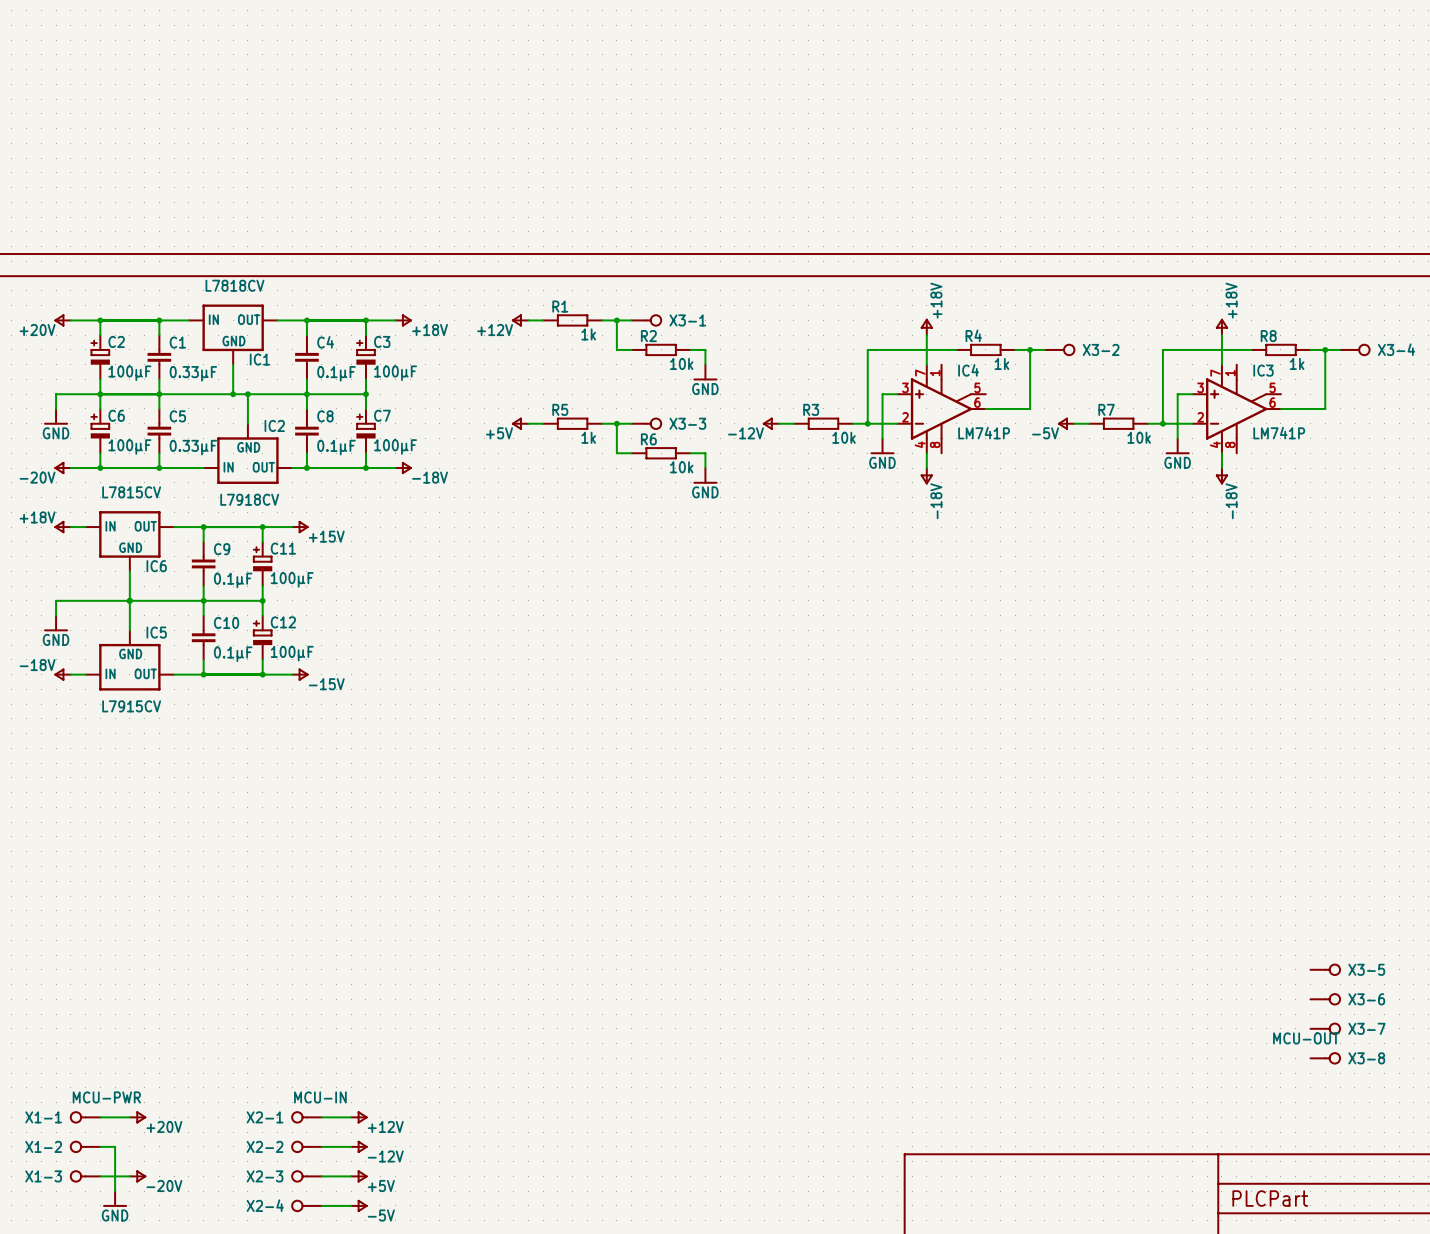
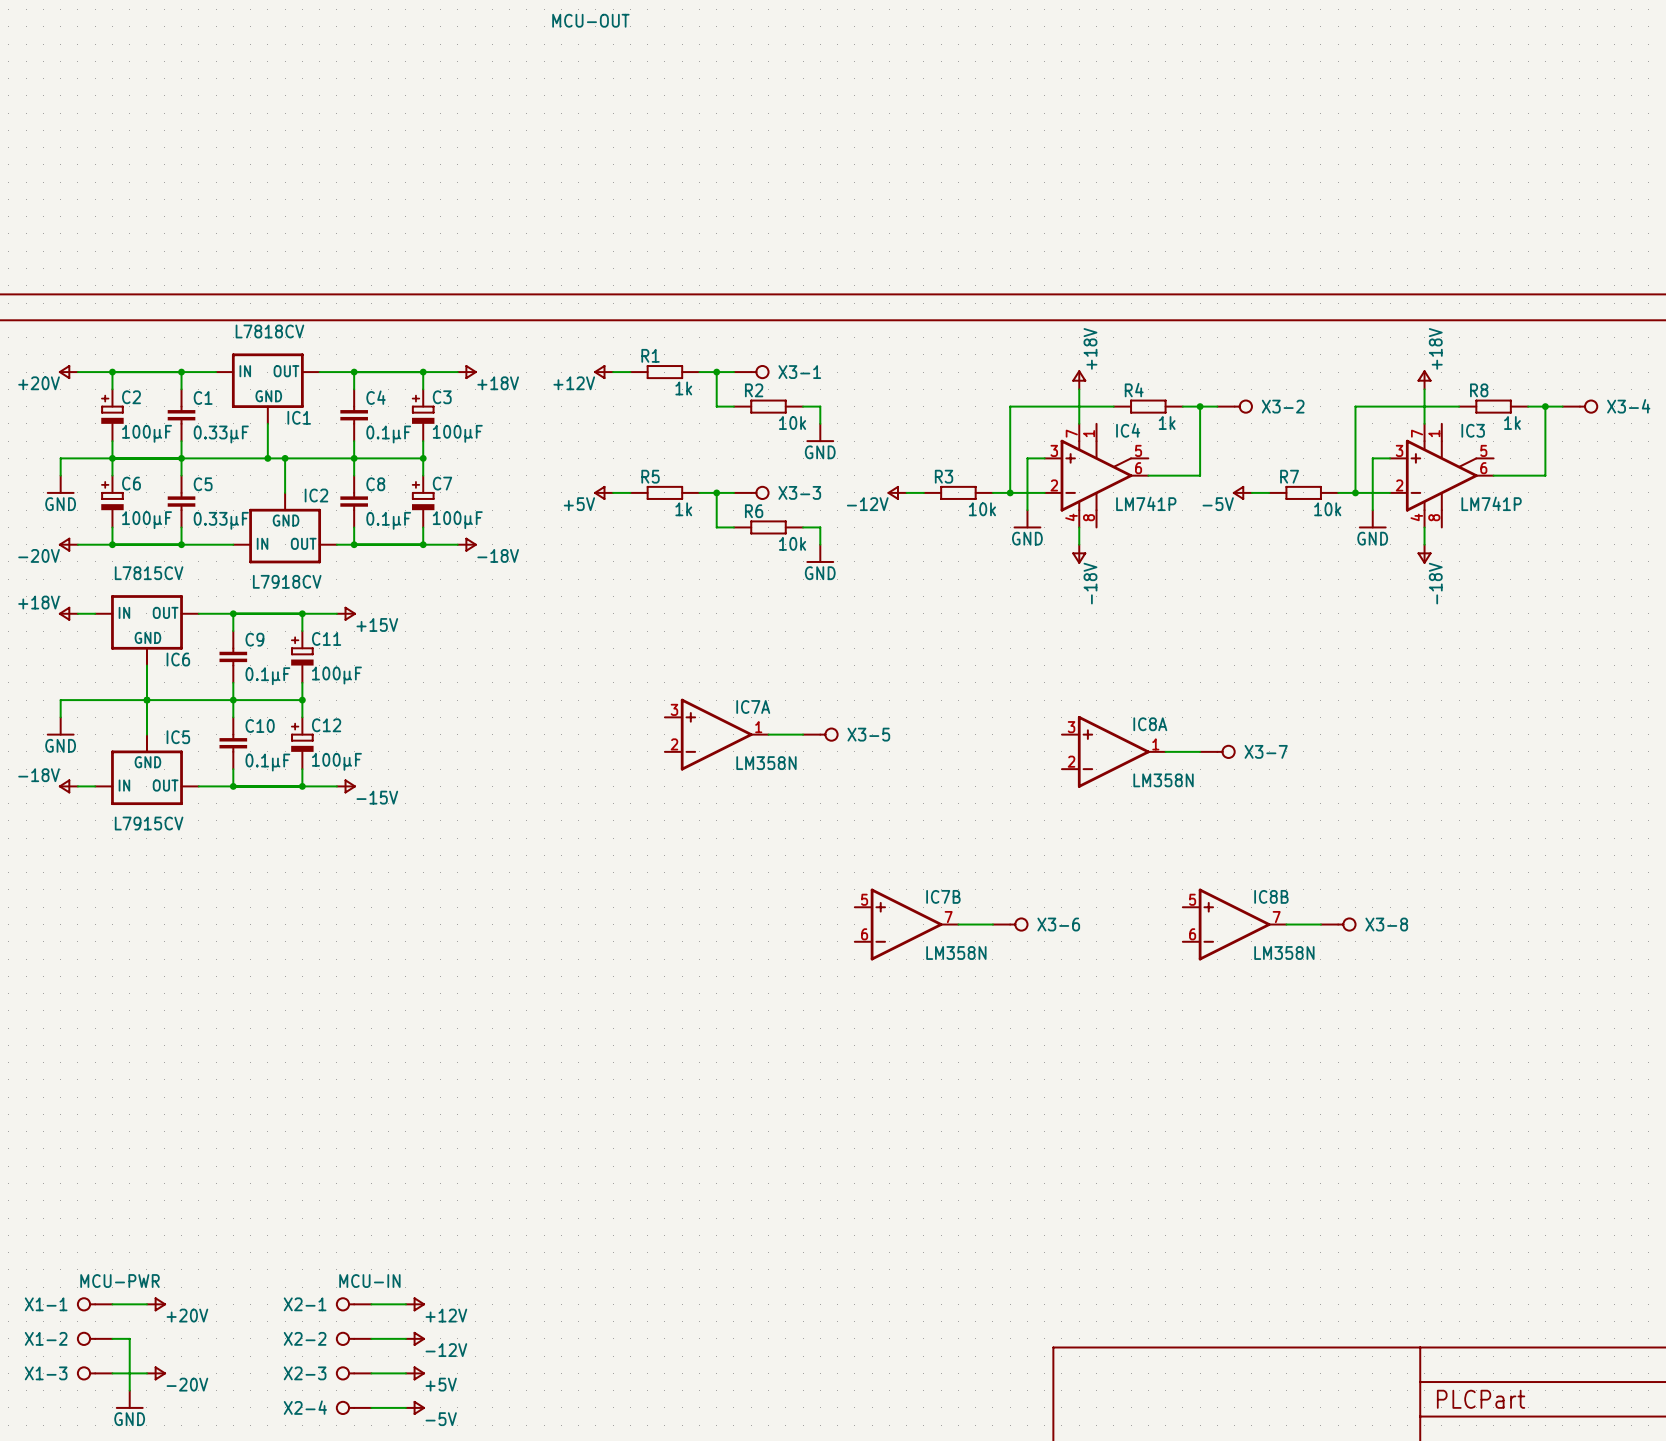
IC7A: none -> LM358N (716, 734)
wire: none -> (768, 734) (803, 734)
IC8A: none -> LM358N (1113, 751)
wire: none -> (1165, 751) (1200, 751)
IC7B: none -> LM358N (906, 924)
wire: none -> (958, 924) (992, 924)
IC8B: none -> LM358N (1234, 924)
wire: none -> (1286, 924) (1320, 924)
X3-5 position: (1325, 969) -> (820, 734)
X3-6 position: (1325, 999) -> (1010, 924)
X3-7 position: (1325, 1028) -> (1217, 751)
X3-8 value position: MCU-OUT (1306, 1038) -> MCU-OUT (590, 20)
X3-8 position: (1325, 1058) -> (1338, 924)

